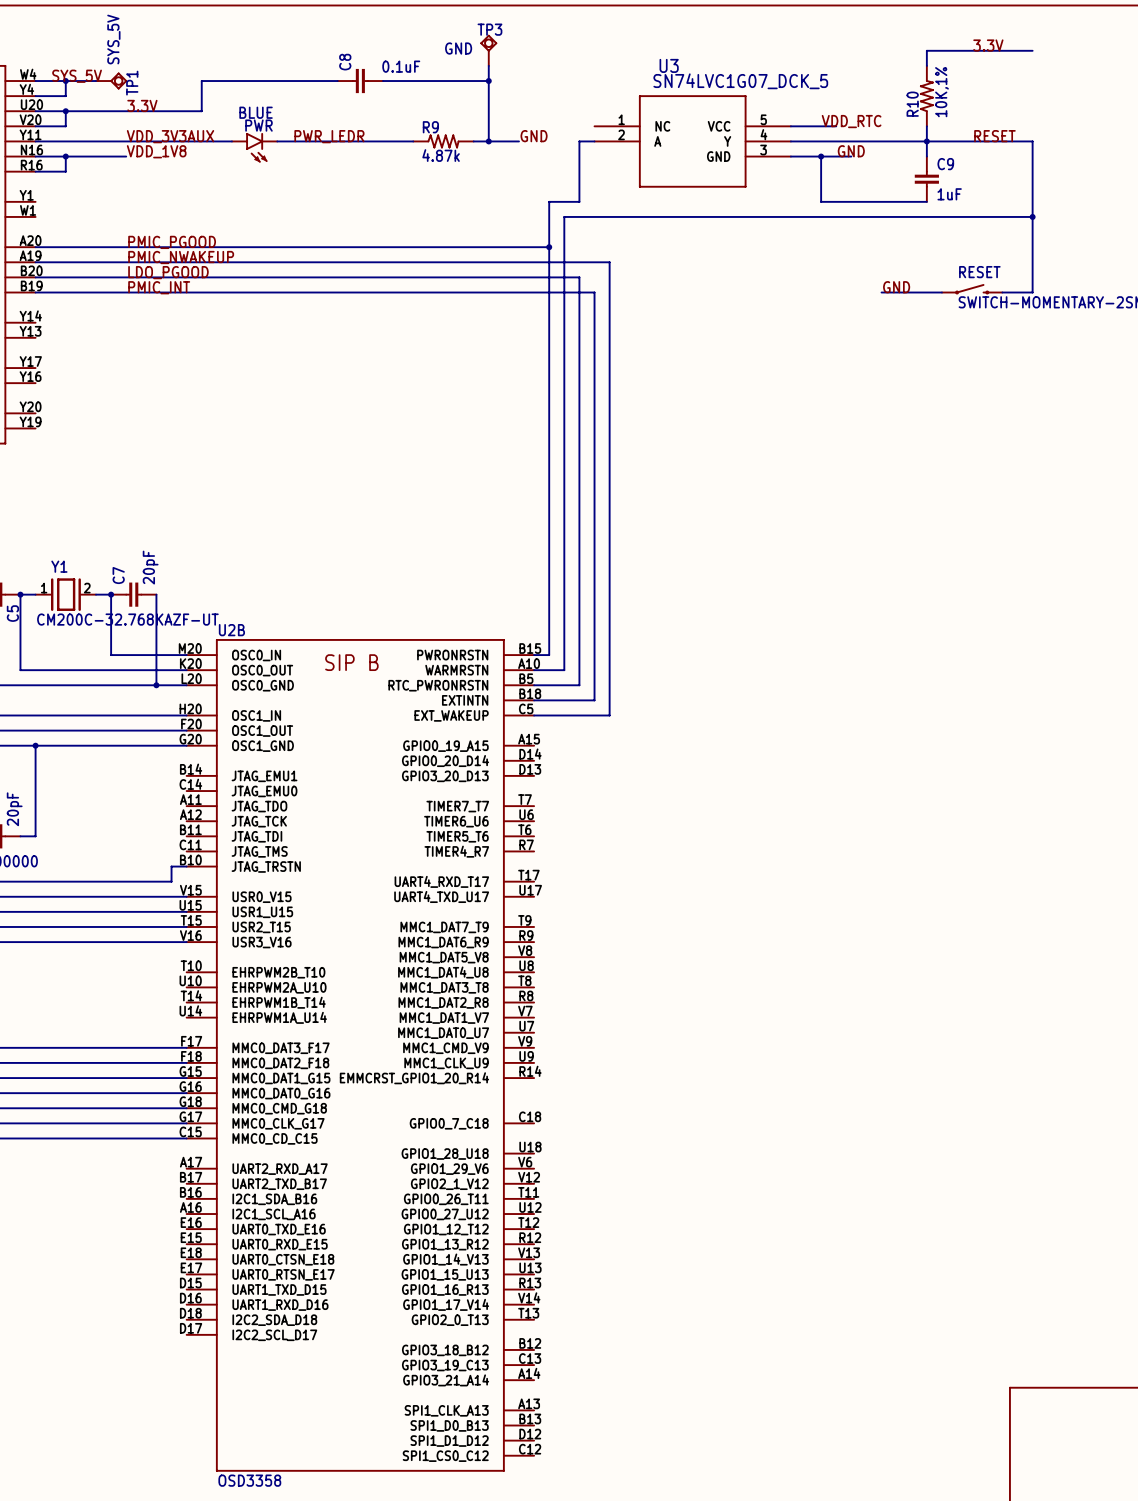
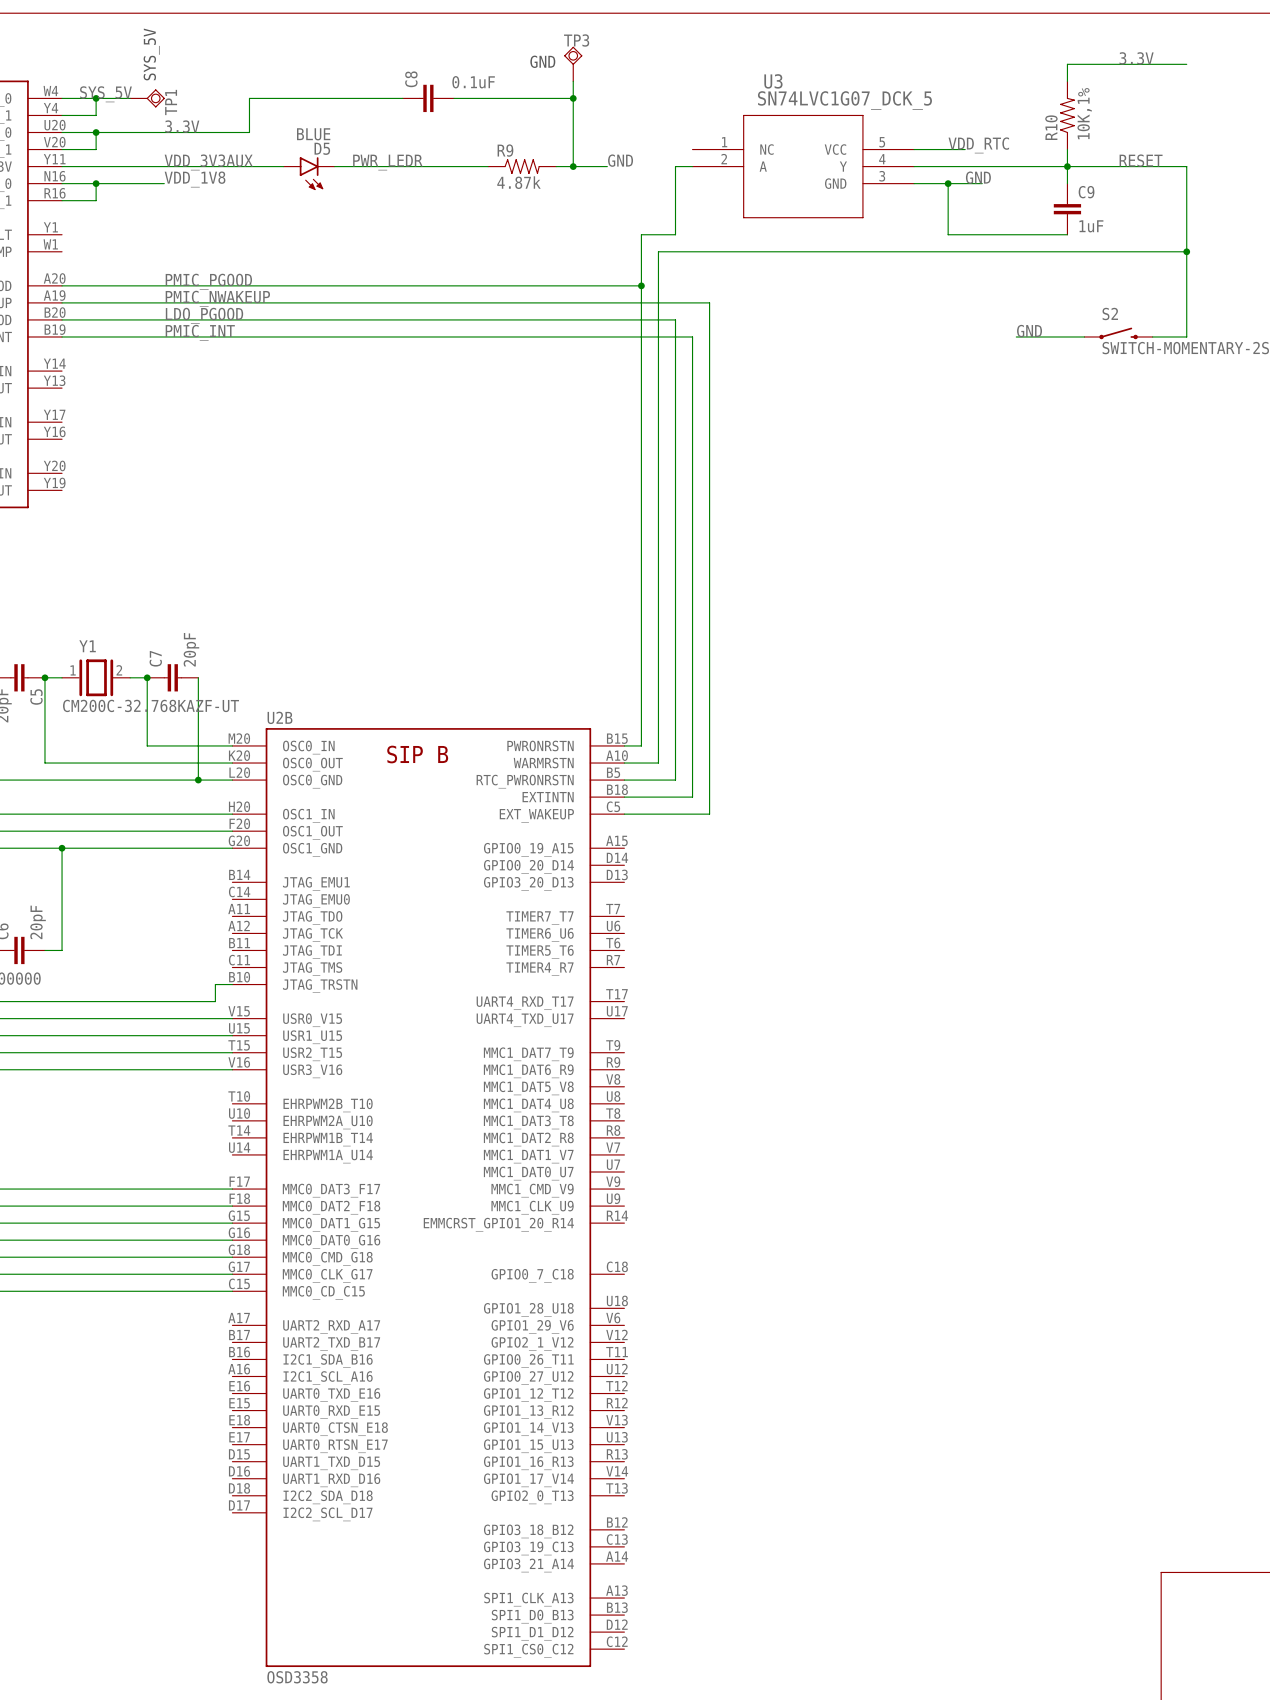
PWR name: PWR (258, 125) -> D5 (322, 148)
RESET name: RESET (979, 272) -> S2 (1110, 313)

